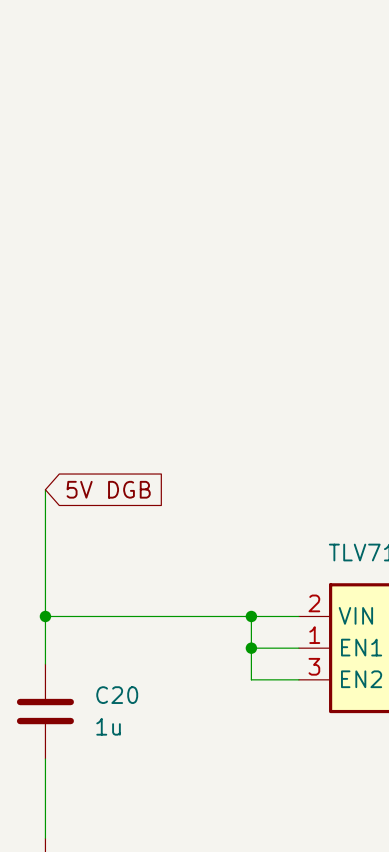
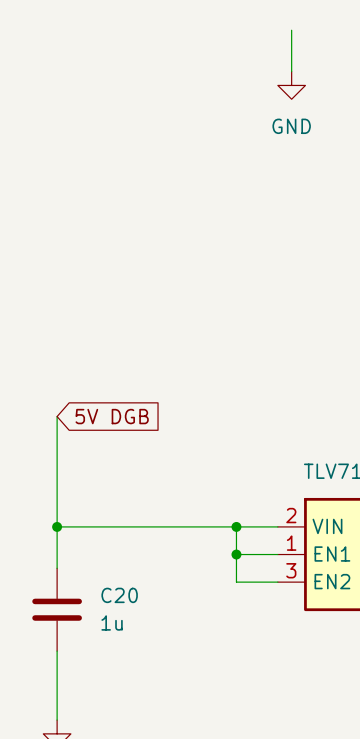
wire: none -> (291, 30) (291, 71)
power symbol: none -> GND (291, 85)

